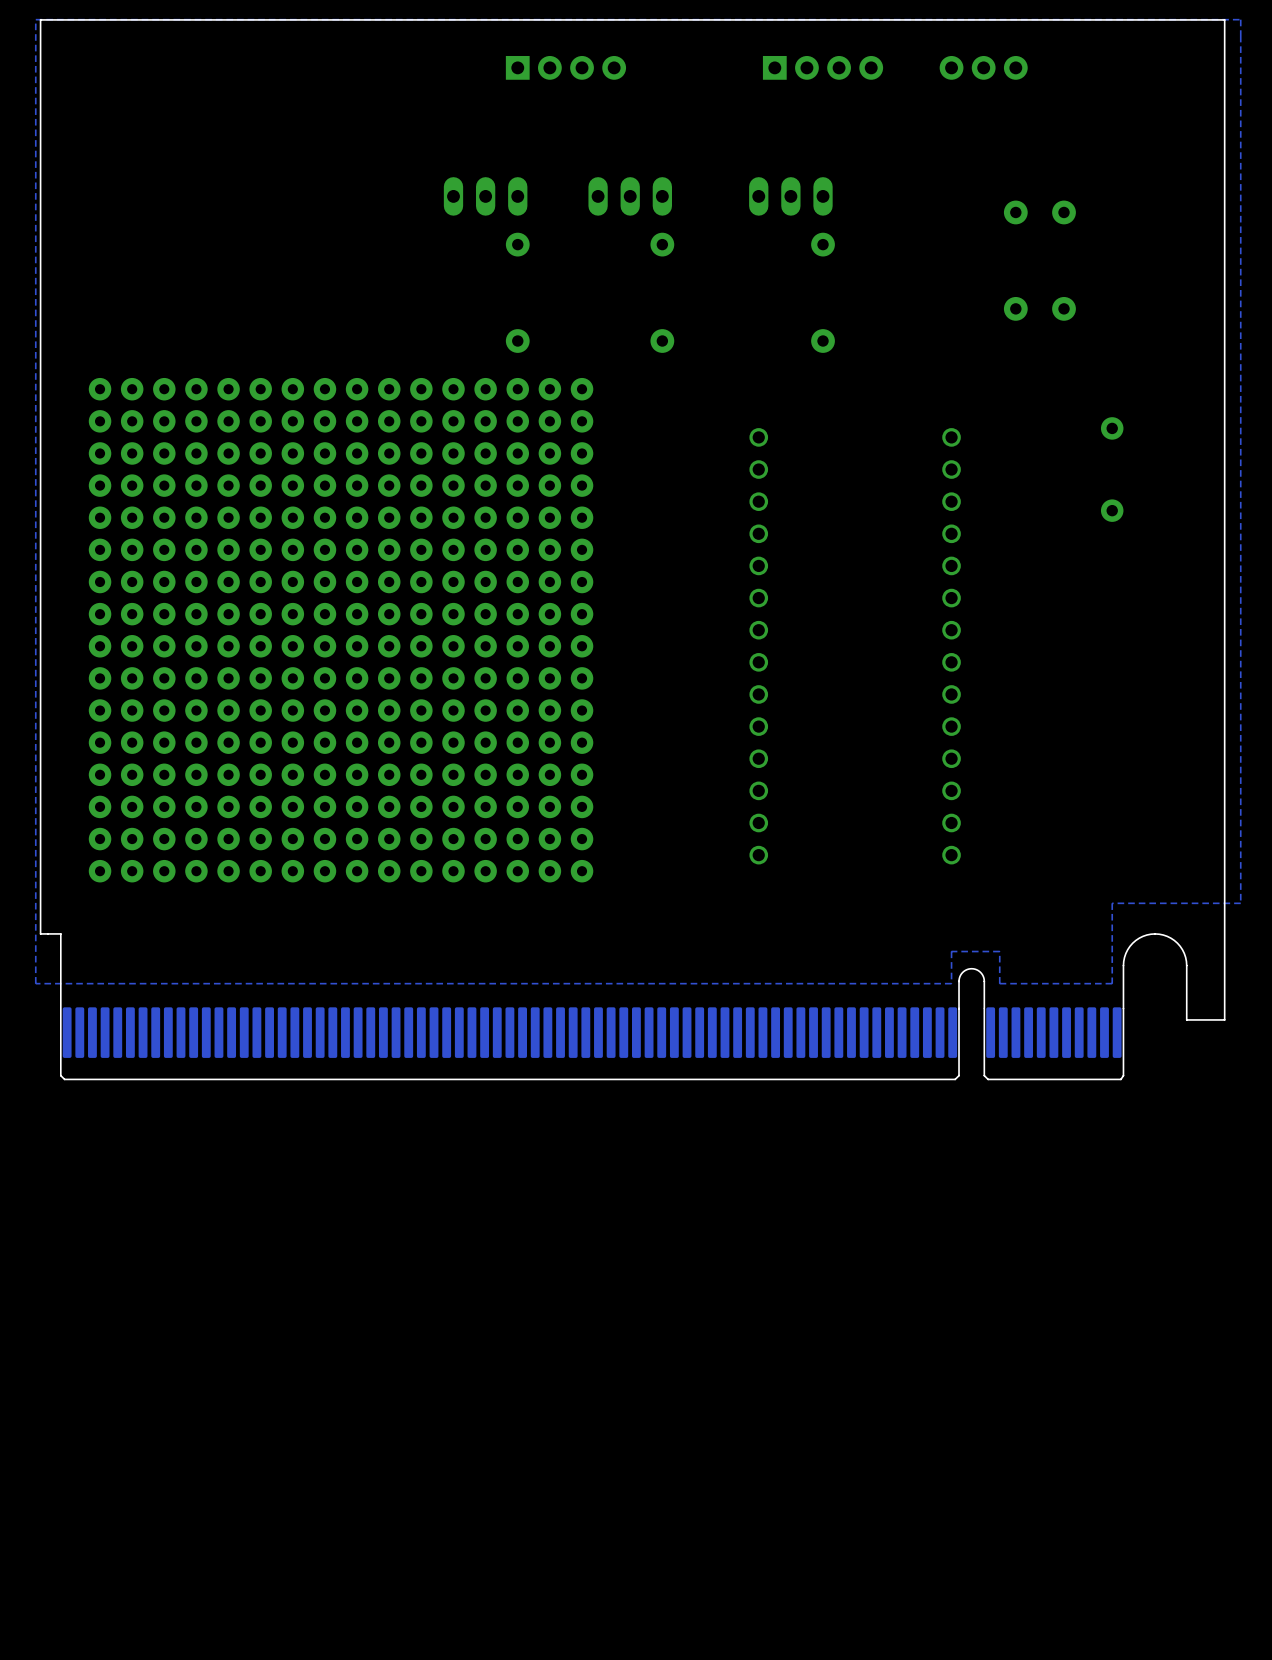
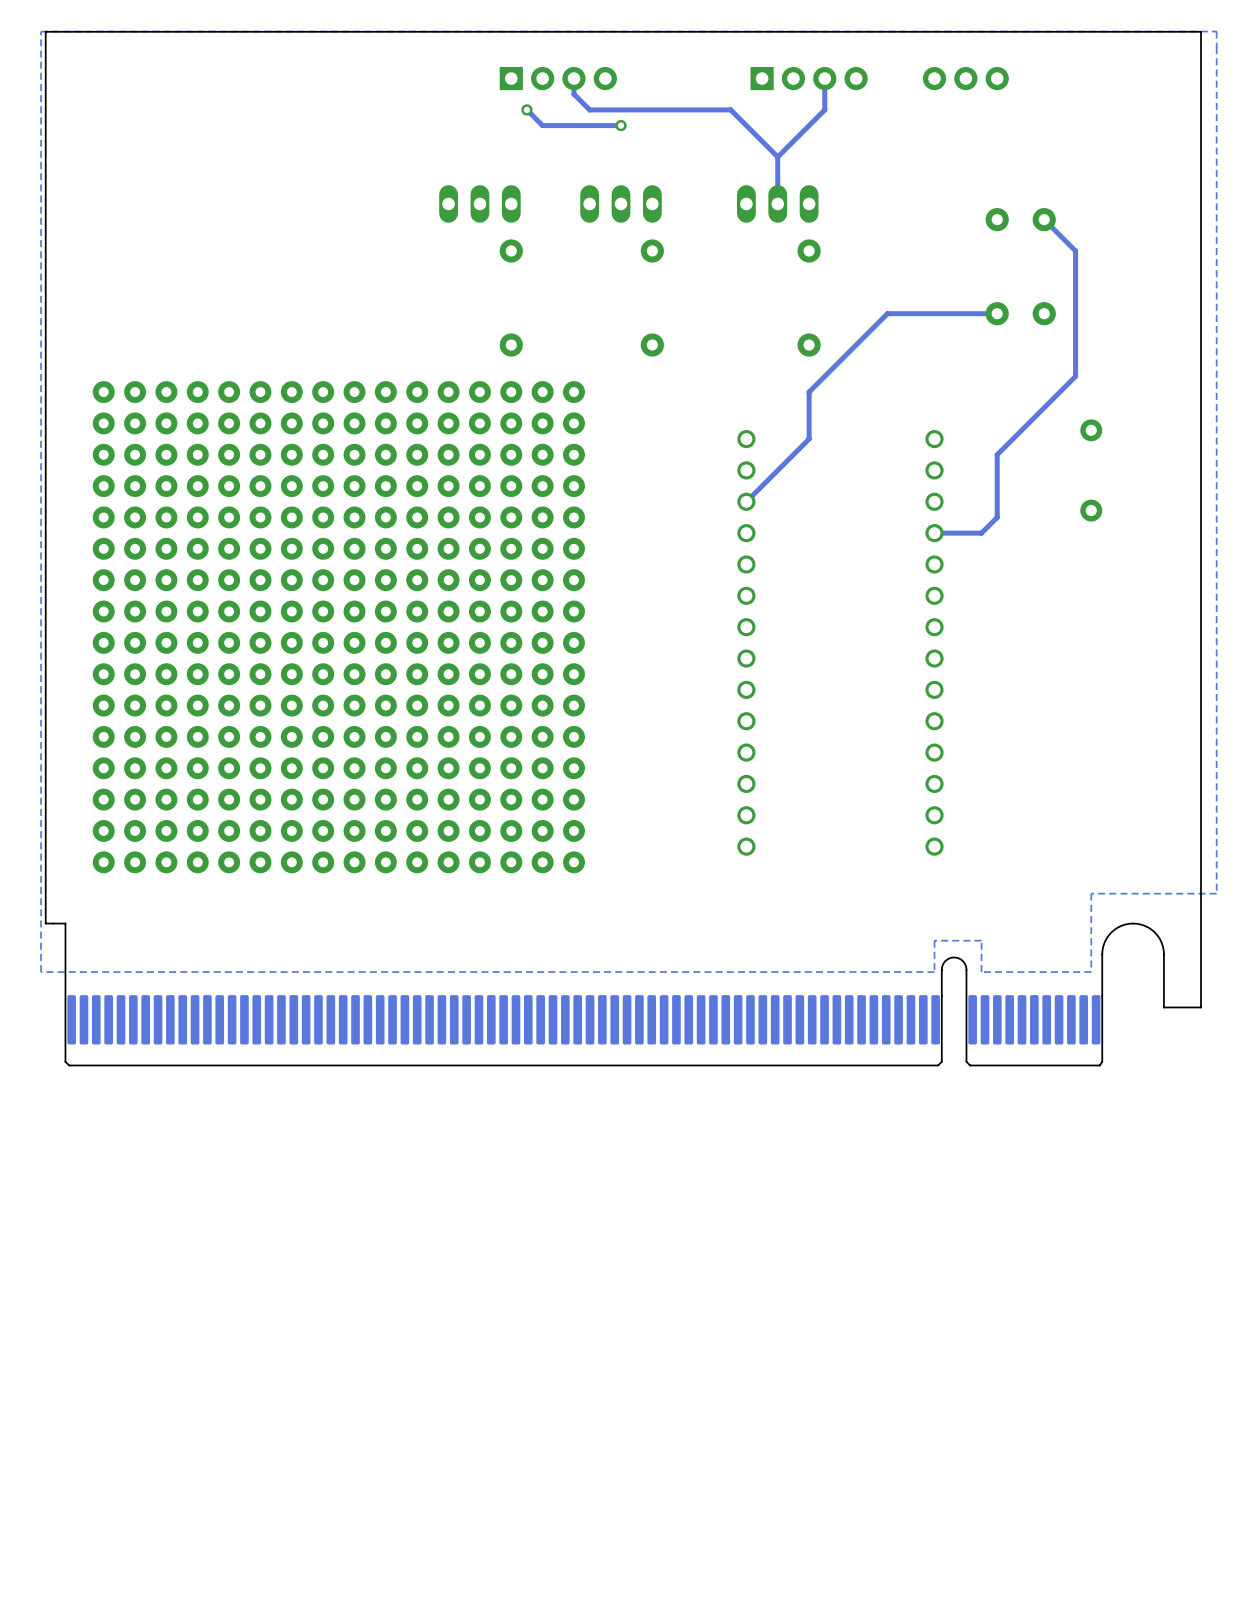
track: none -> (573, 78) (573, 94) (589, 109) (730, 109) (777, 156)
track: none -> (824, 78) (824, 109) (777, 156)
track: none -> (526, 109) (542, 125) (621, 125)
via: none -> (526, 109)
via: none -> (621, 125)
track: none -> (777, 156) (777, 203)
track: none -> (1044, 219) (1075, 250) (1075, 376) (997, 454) (997, 517) (981, 533) (934, 533)
track: none -> (997, 313) (887, 313) (809, 392) (809, 439) (746, 501)

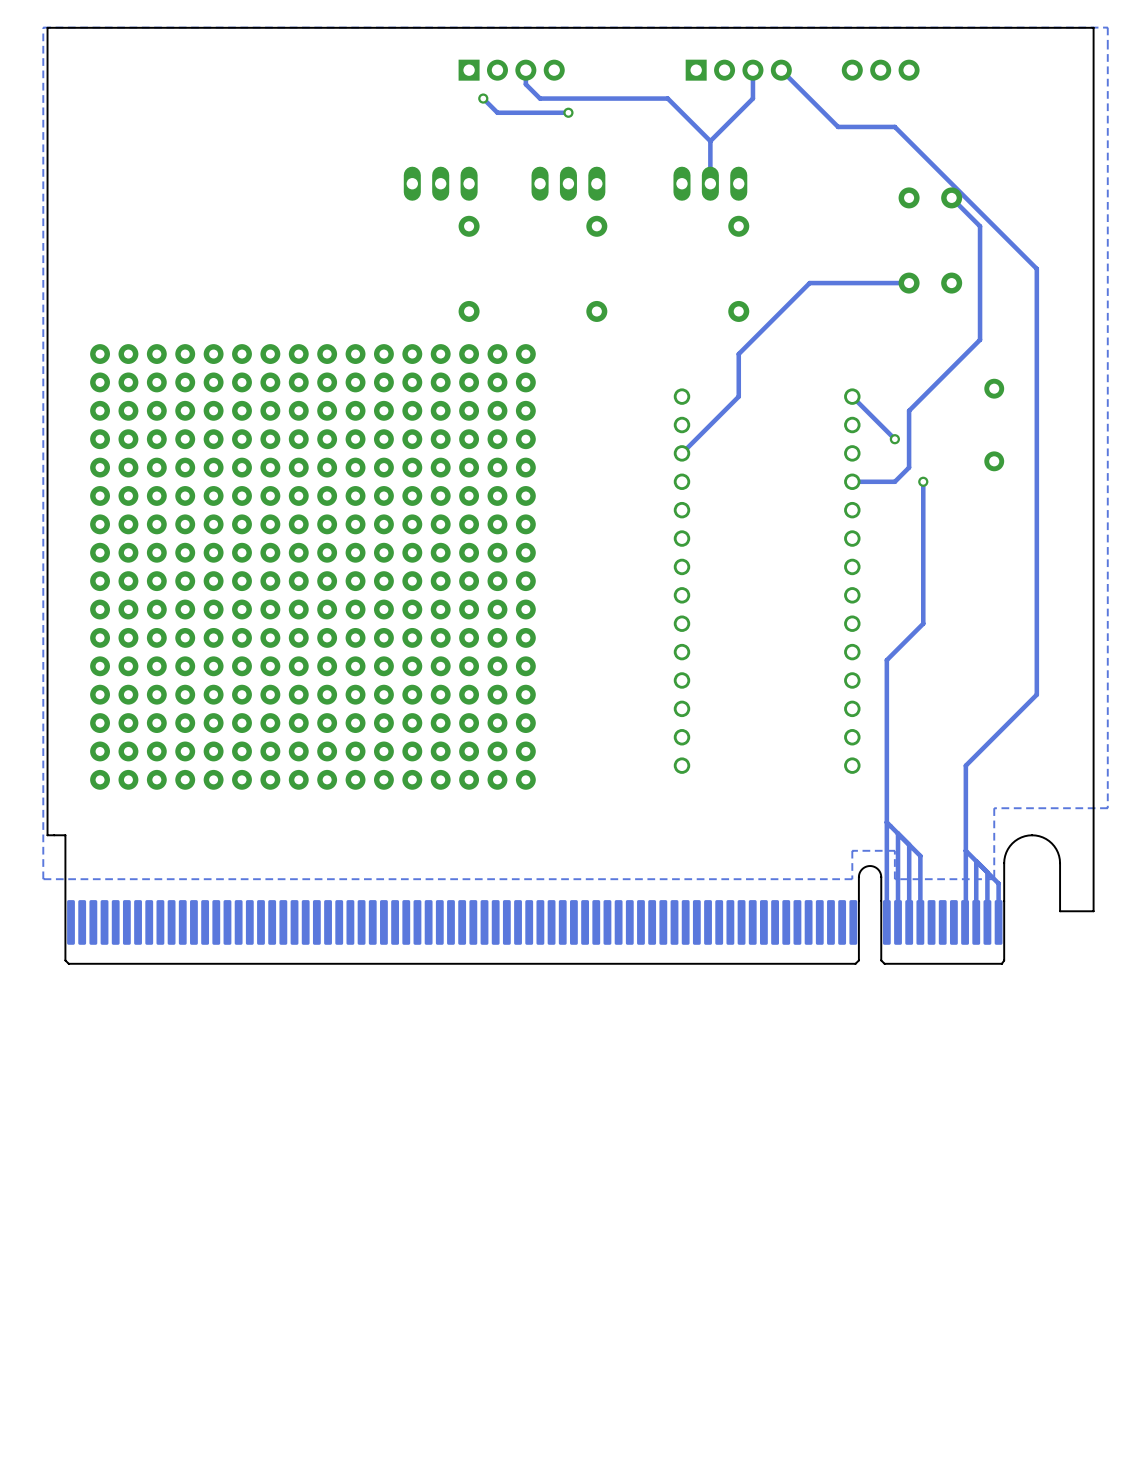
track: none -> (781, 70) (838, 126) (894, 126) (1036, 268) (1036, 694) (965, 765) (965, 922)
track: none -> (852, 396) (894, 439)
via: none -> (894, 439)
track: none -> (923, 481) (923, 623) (886, 660) (886, 922)
via: none -> (923, 481)
track: none -> (886, 822) (920, 855) (920, 922)
track: none -> (898, 833) (898, 922)
track: none -> (909, 844) (909, 922)
track: none -> (965, 850) (998, 883) (998, 922)
track: none -> (976, 861) (976, 922)
track: none -> (987, 872) (987, 922)

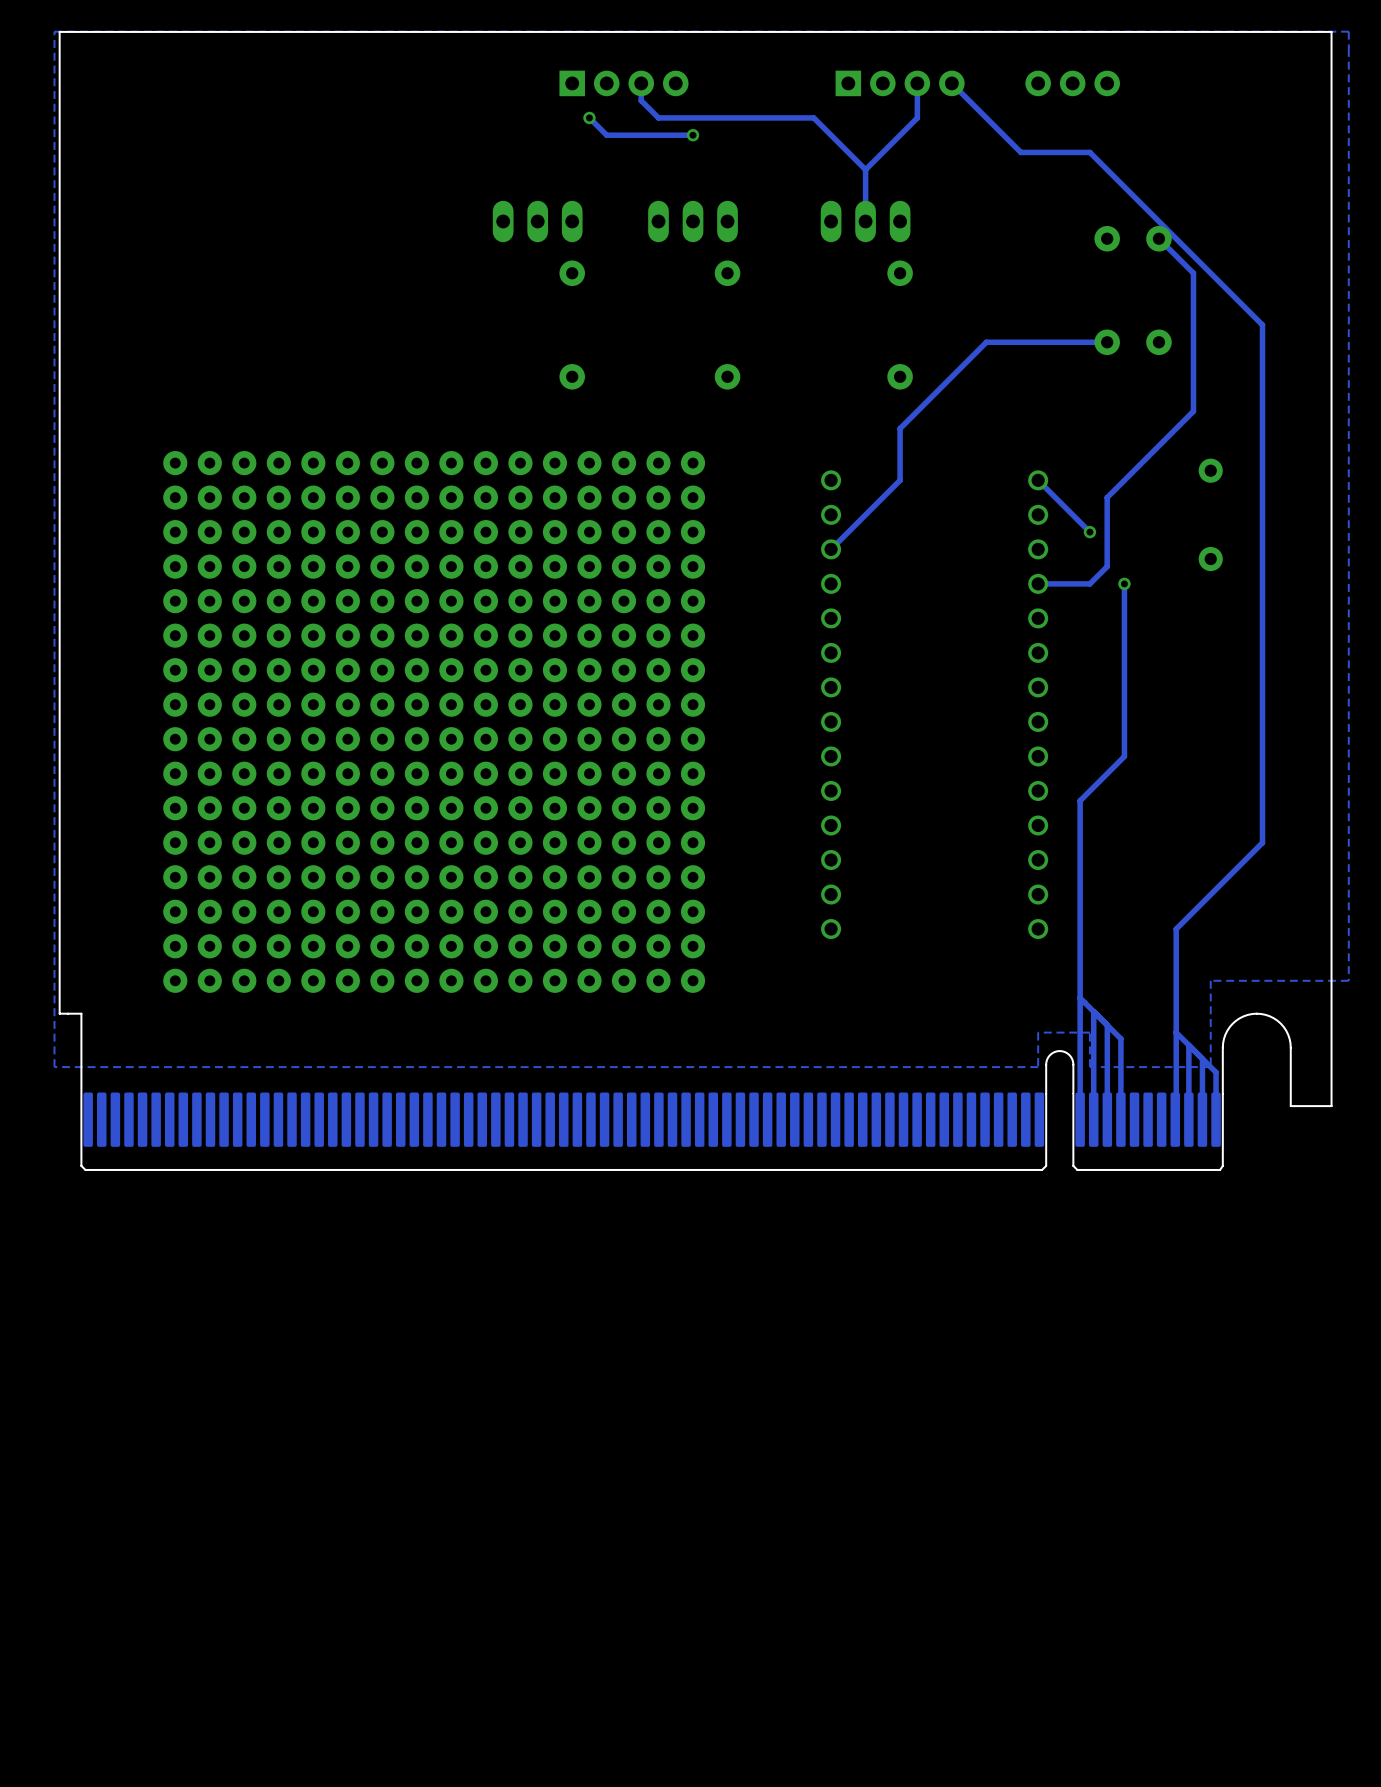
part position: (312, 566) -> (434, 721)

